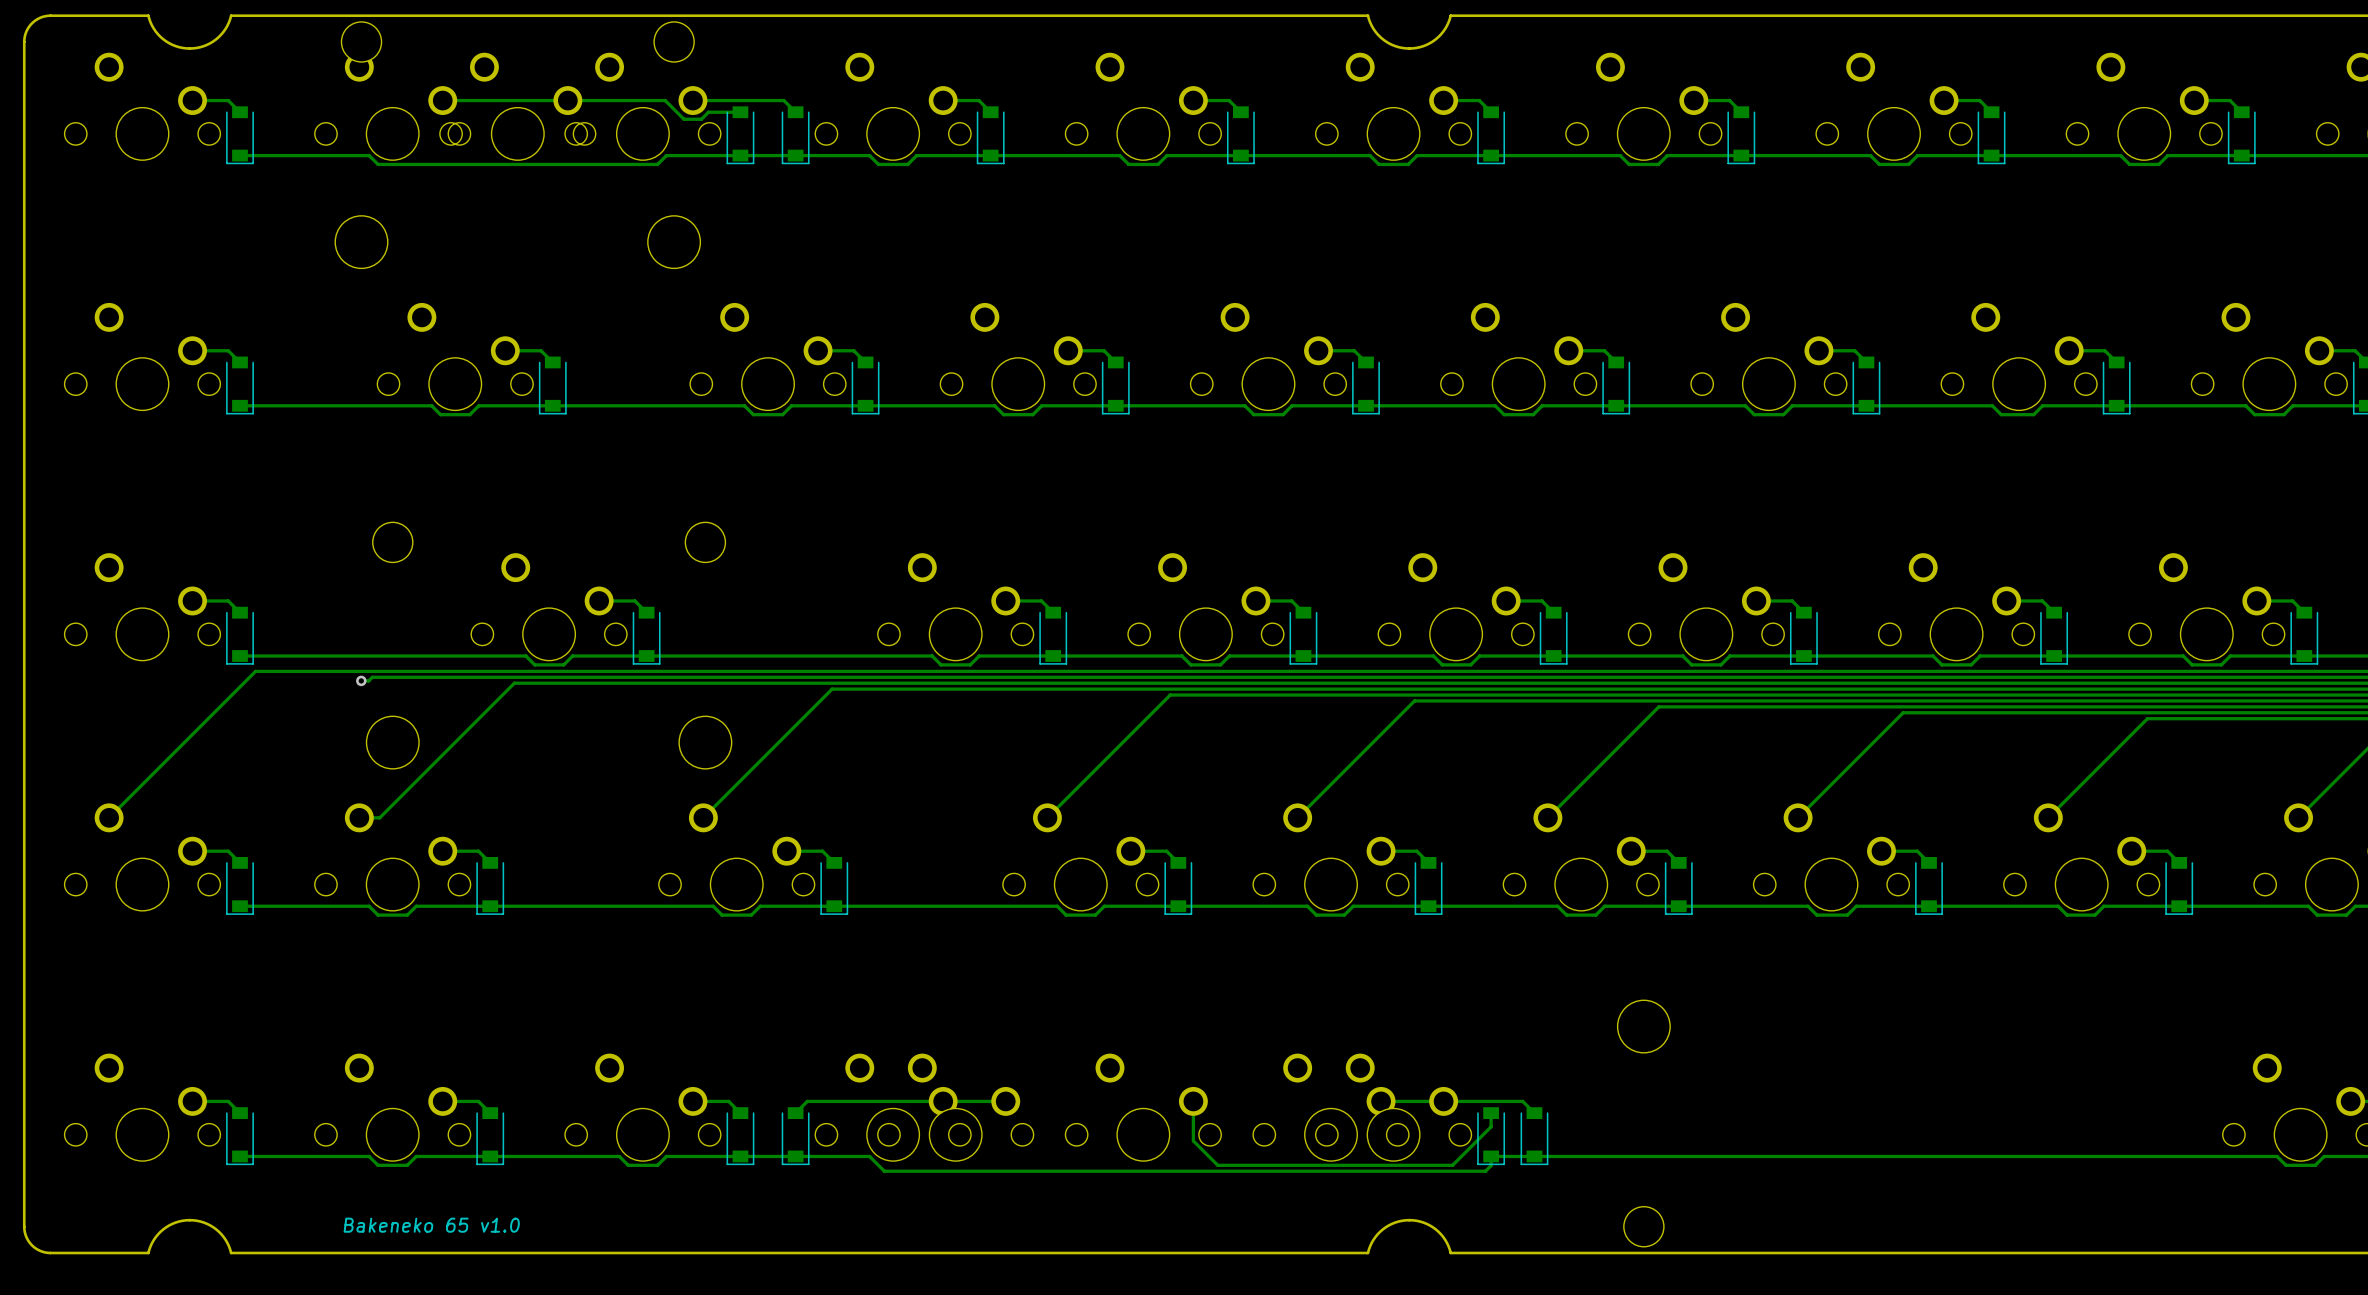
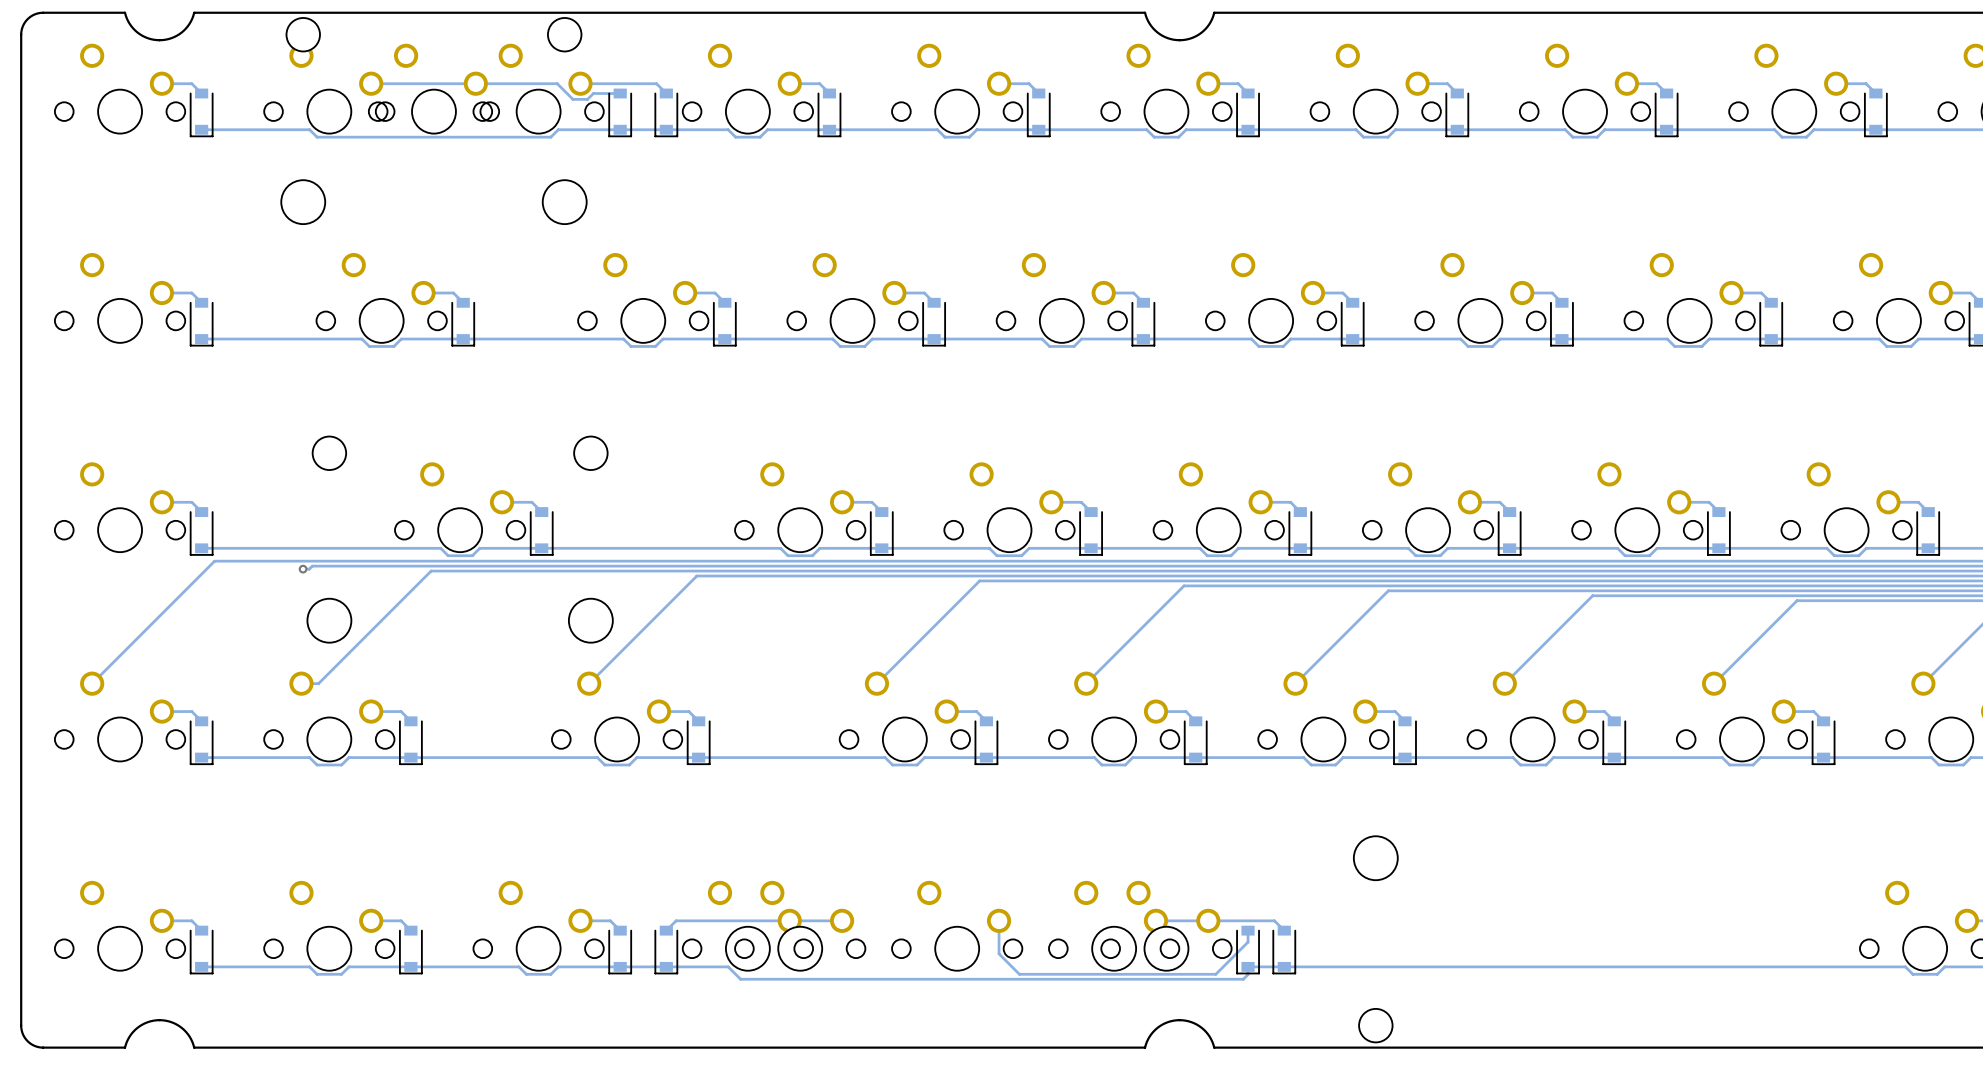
text: Bakeneko 65 v1.0 (431, 1225) -> none

